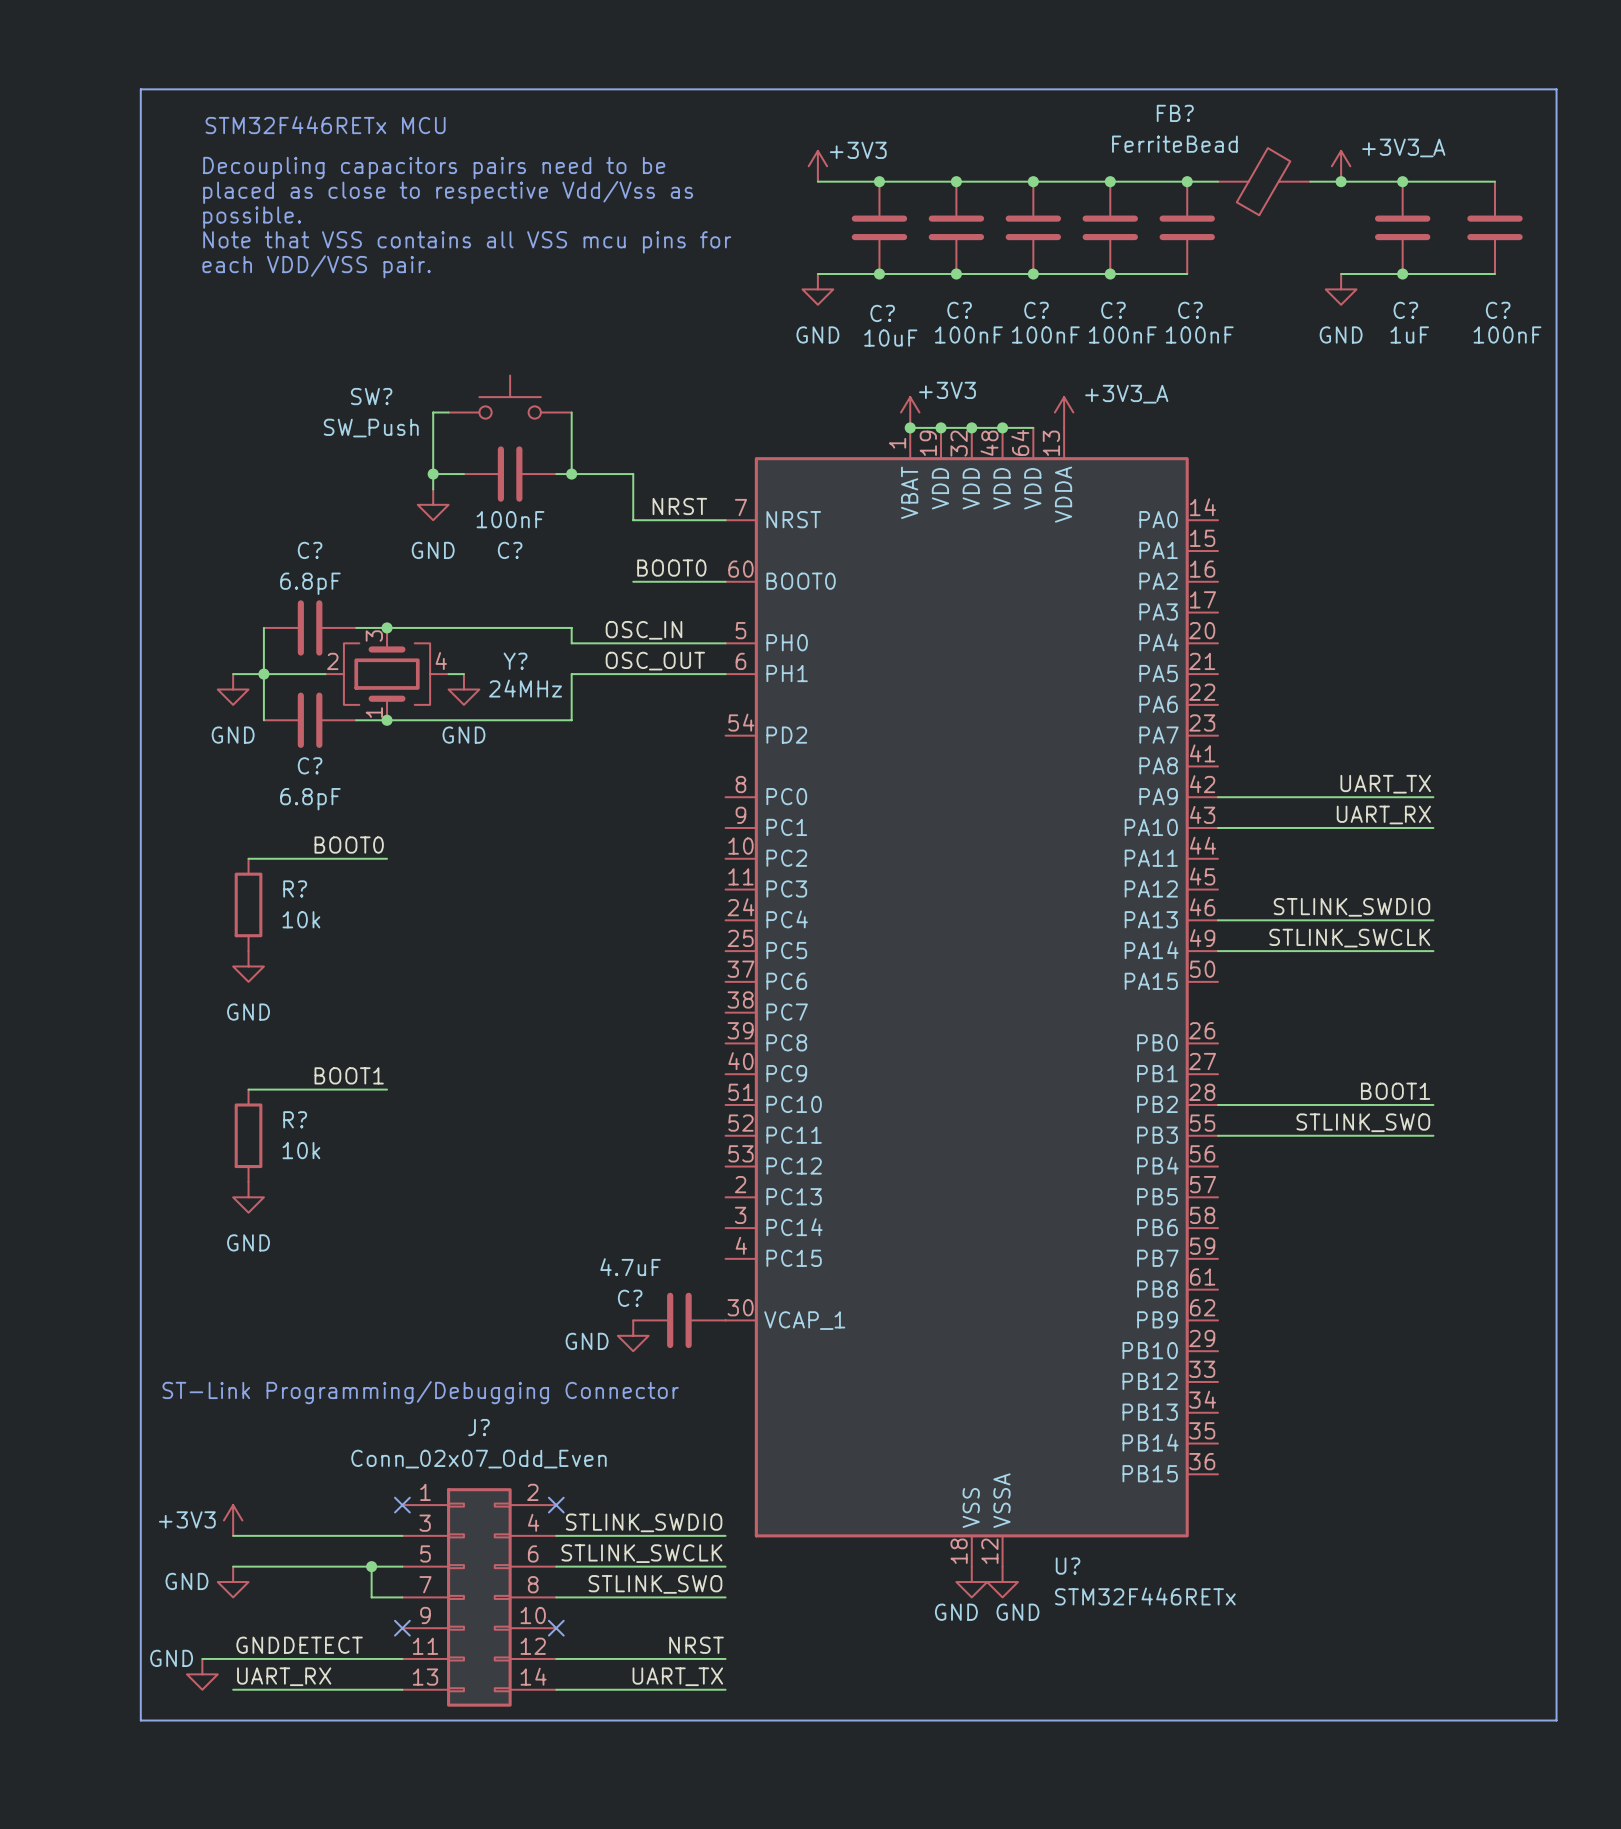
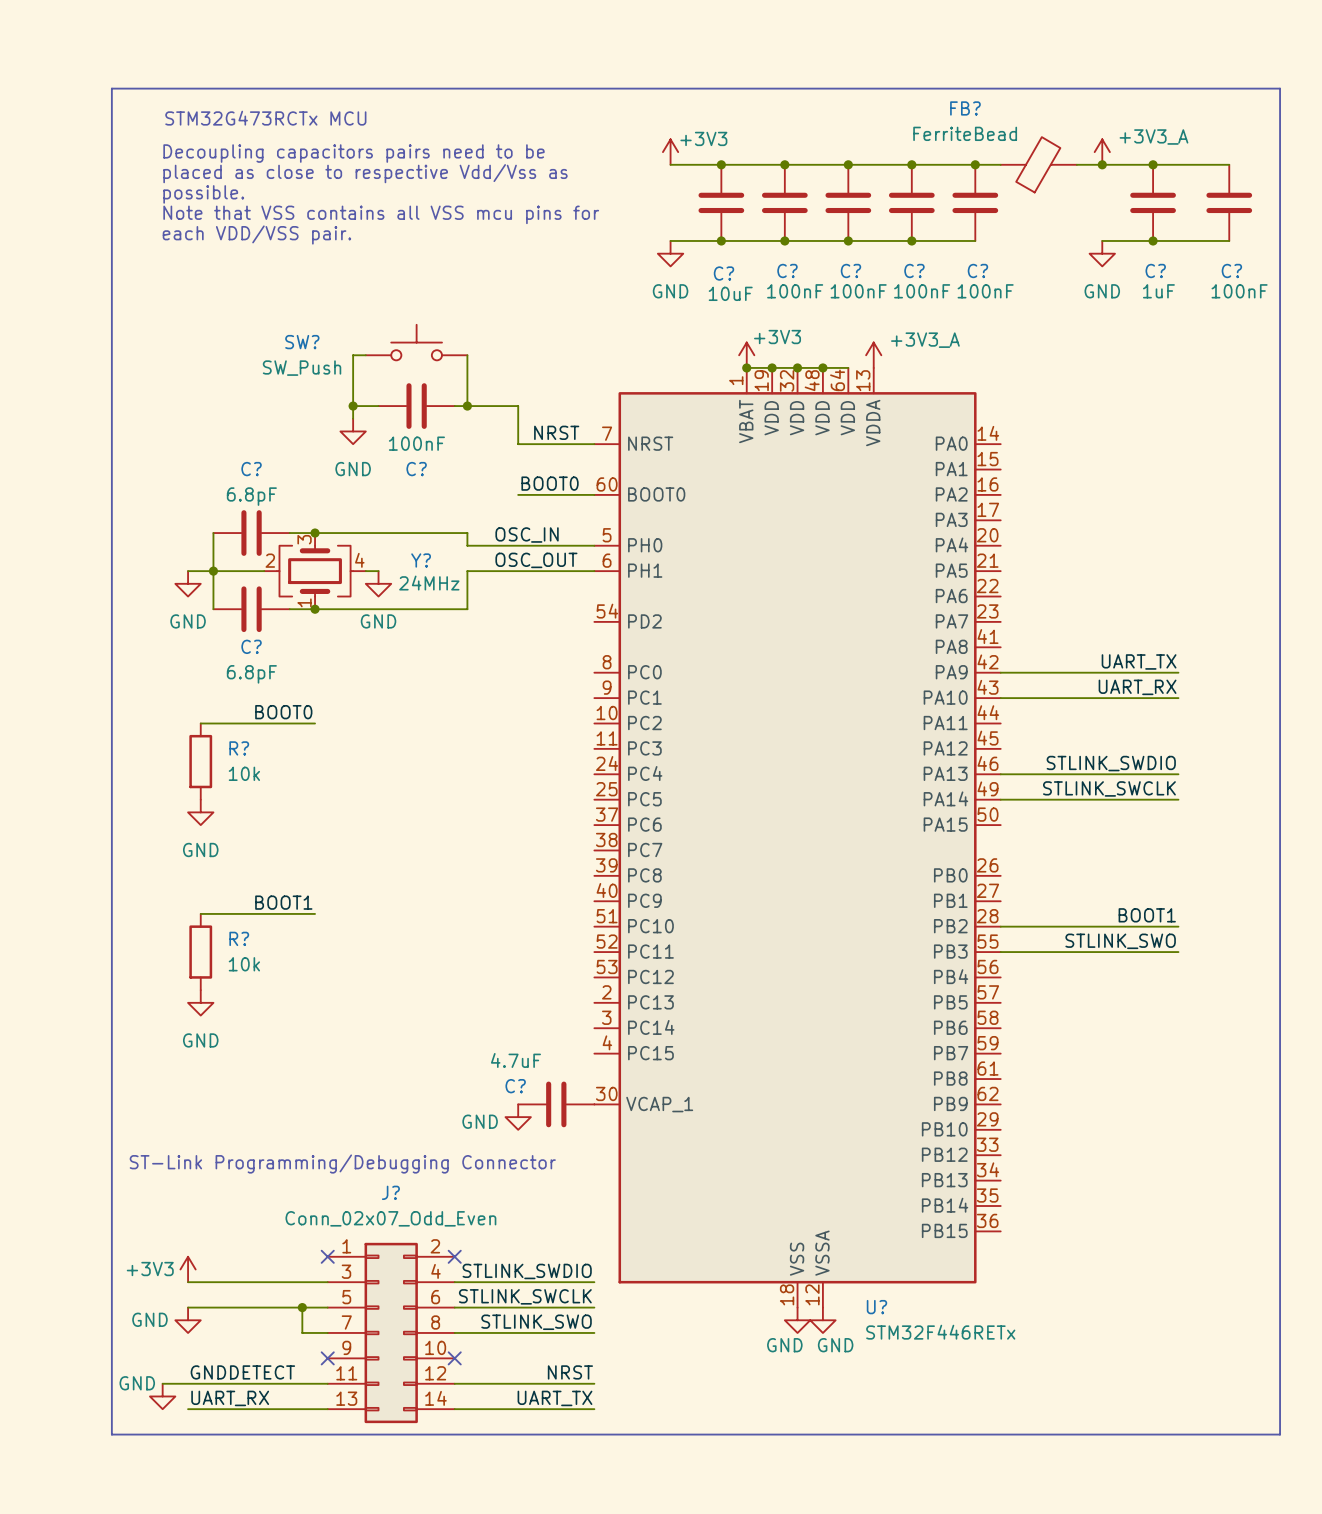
text: STM32F446RETx MCU (325, 125) -> STM32G473RCTx MCU (265, 118)

